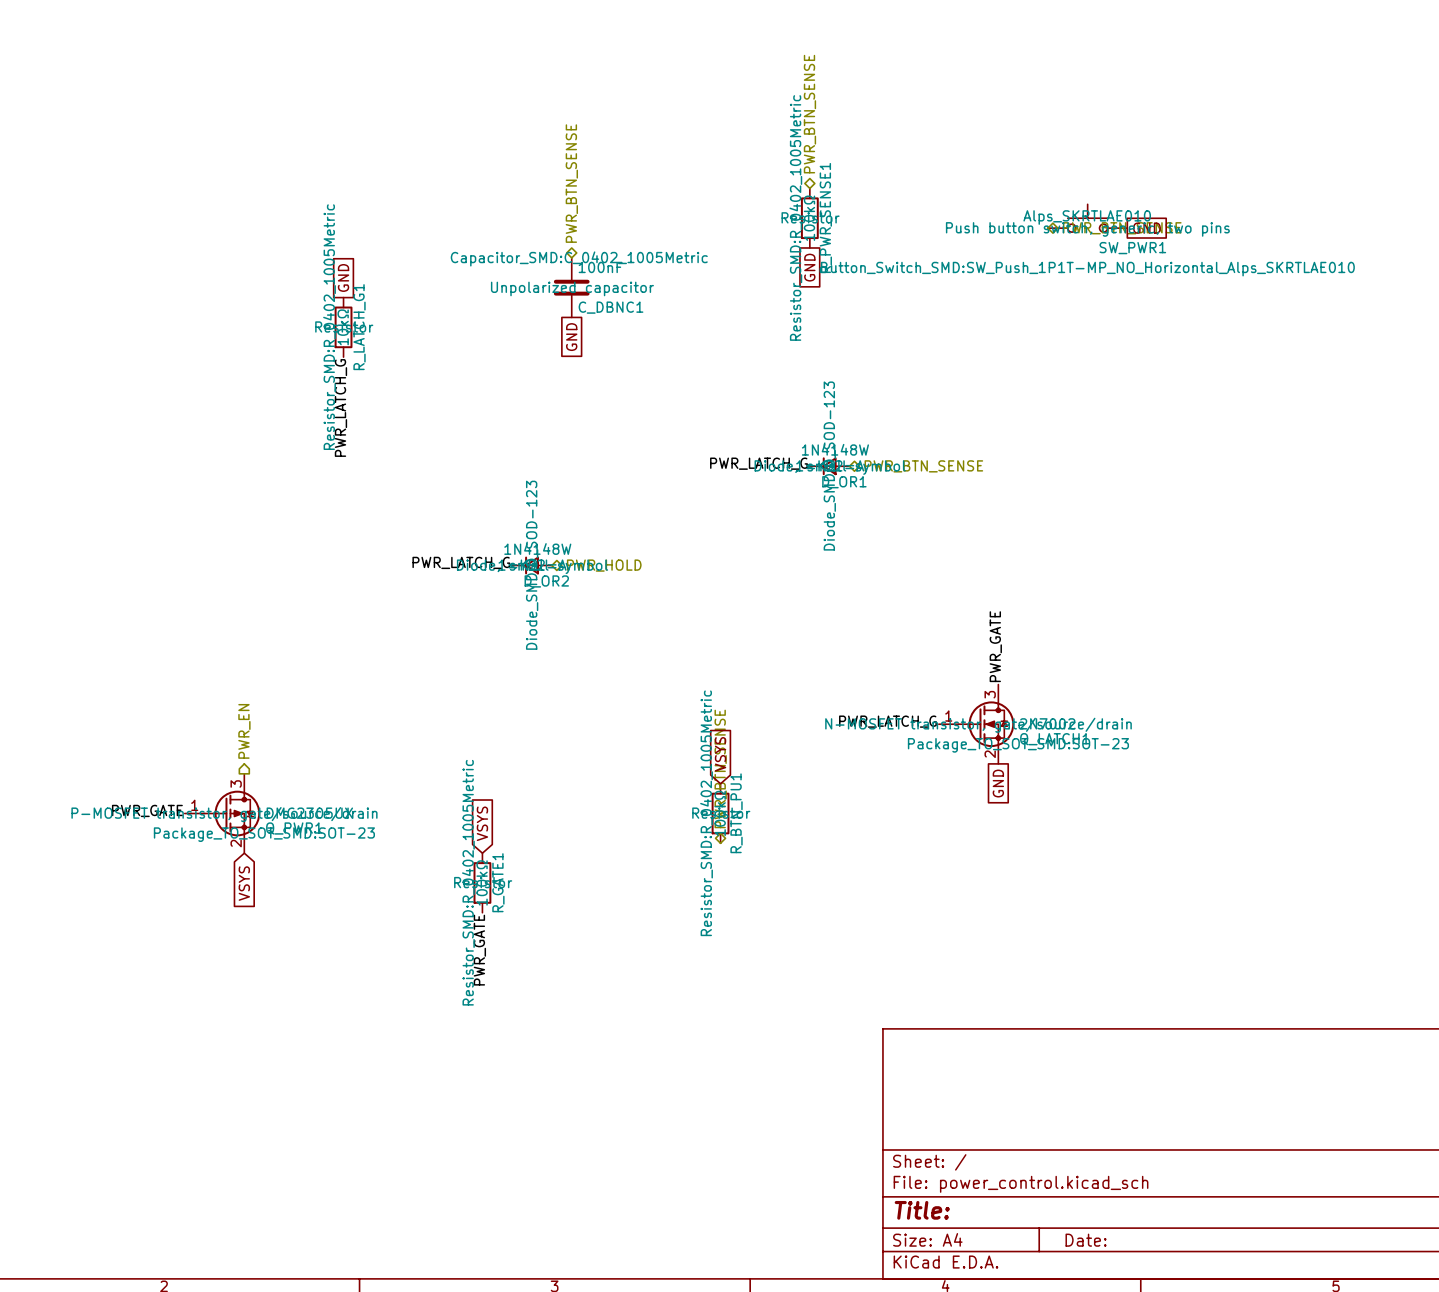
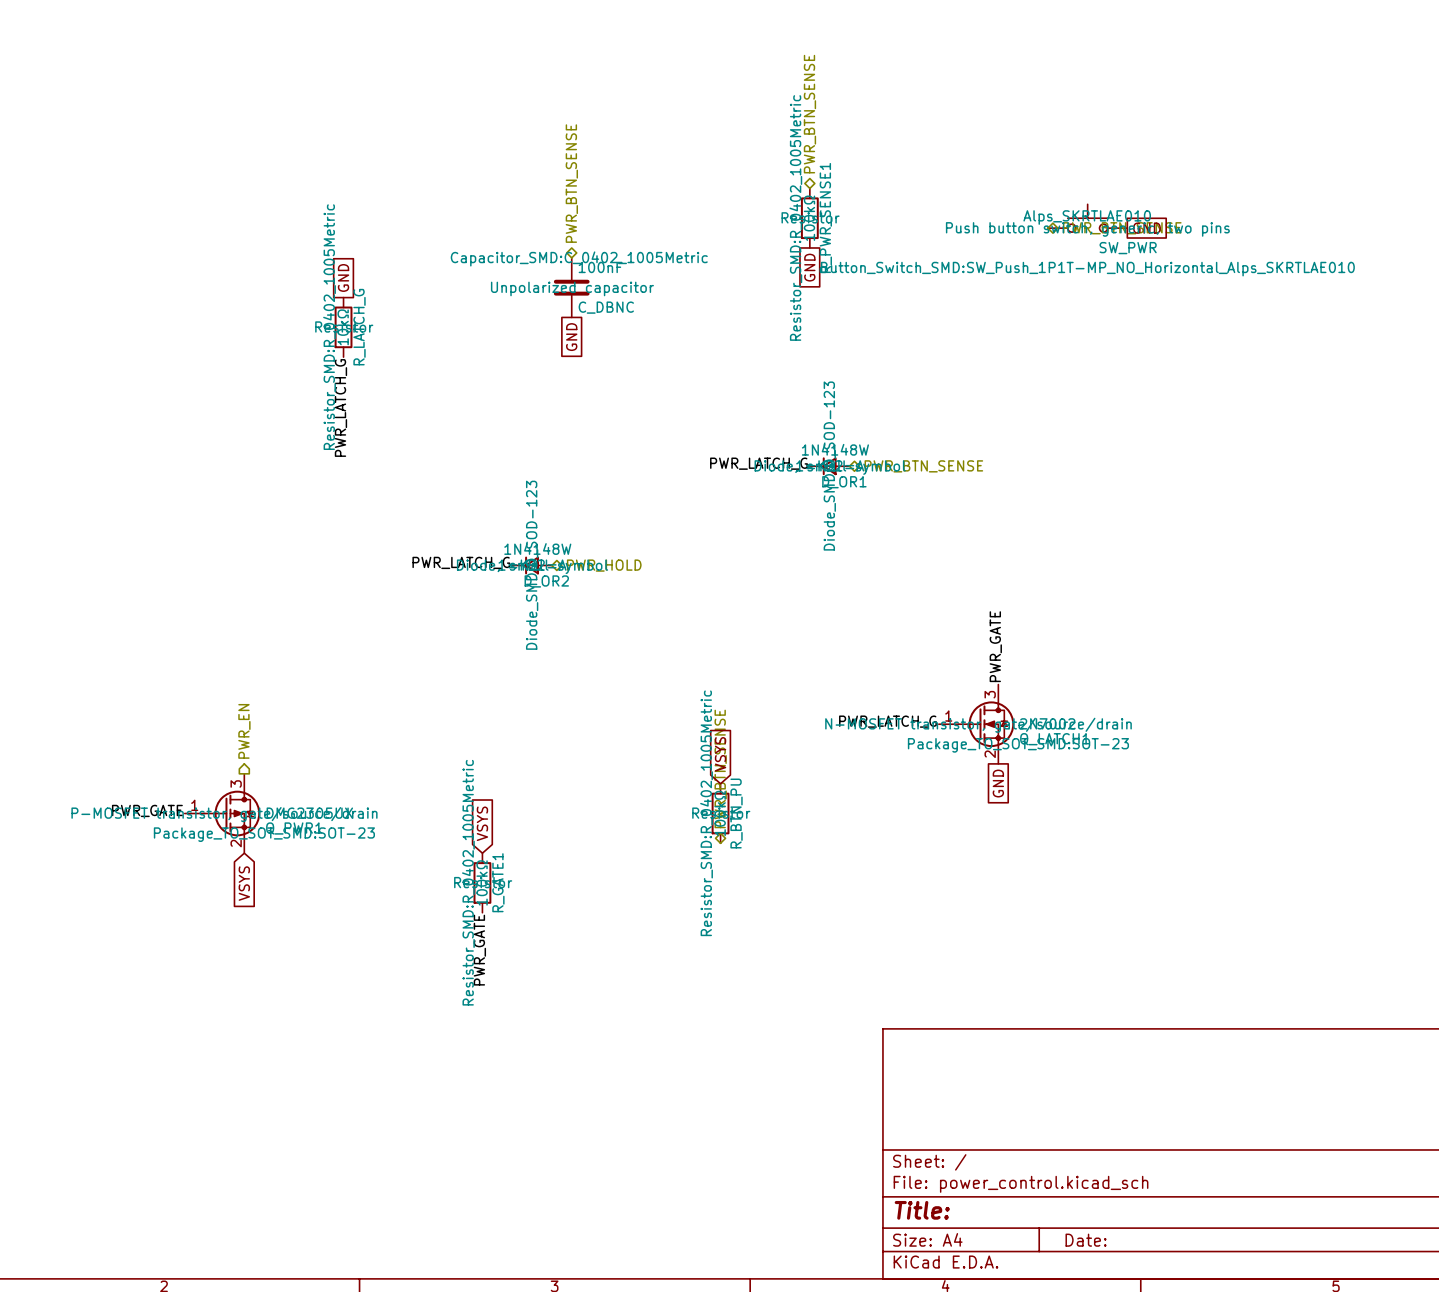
SW_PWR1 name: SW_PWR1 (1132, 248) -> SW_PWR (1128, 248)
C_DBNC1 name: C_DBNC1 (611, 307) -> C_DBNC (606, 307)
R_LATCH_G1 name: R_LATCH_G1 (359, 327) -> R_LATCH_G (359, 327)
R_BTN_PU1 name: R_BTN_PU1 (736, 813) -> R_BTN_PU (736, 813)

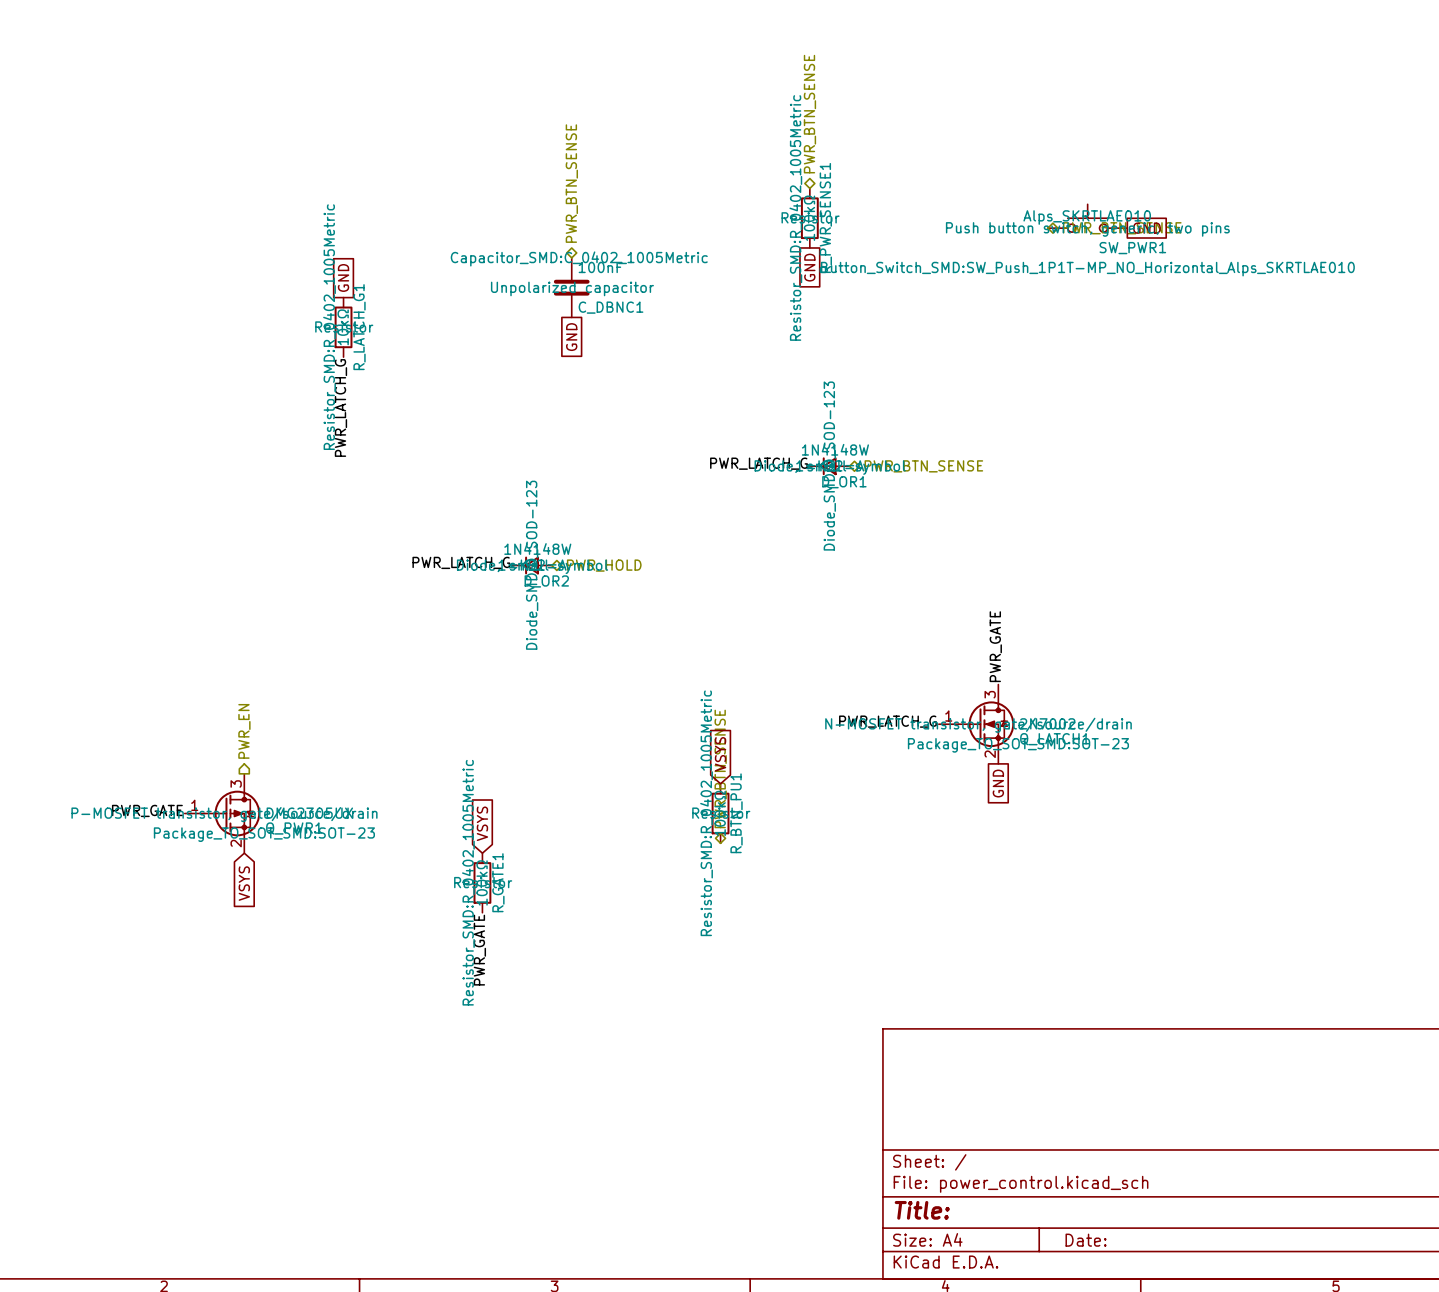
SW_PWR name: SW_PWR (1128, 248) -> SW_PWR1 (1132, 248)
C_DBNC name: C_DBNC (606, 307) -> C_DBNC1 (611, 307)
R_LATCH_G name: R_LATCH_G (359, 327) -> R_LATCH_G1 (359, 327)
R_BTN_PU name: R_BTN_PU (736, 813) -> R_BTN_PU1 (736, 813)

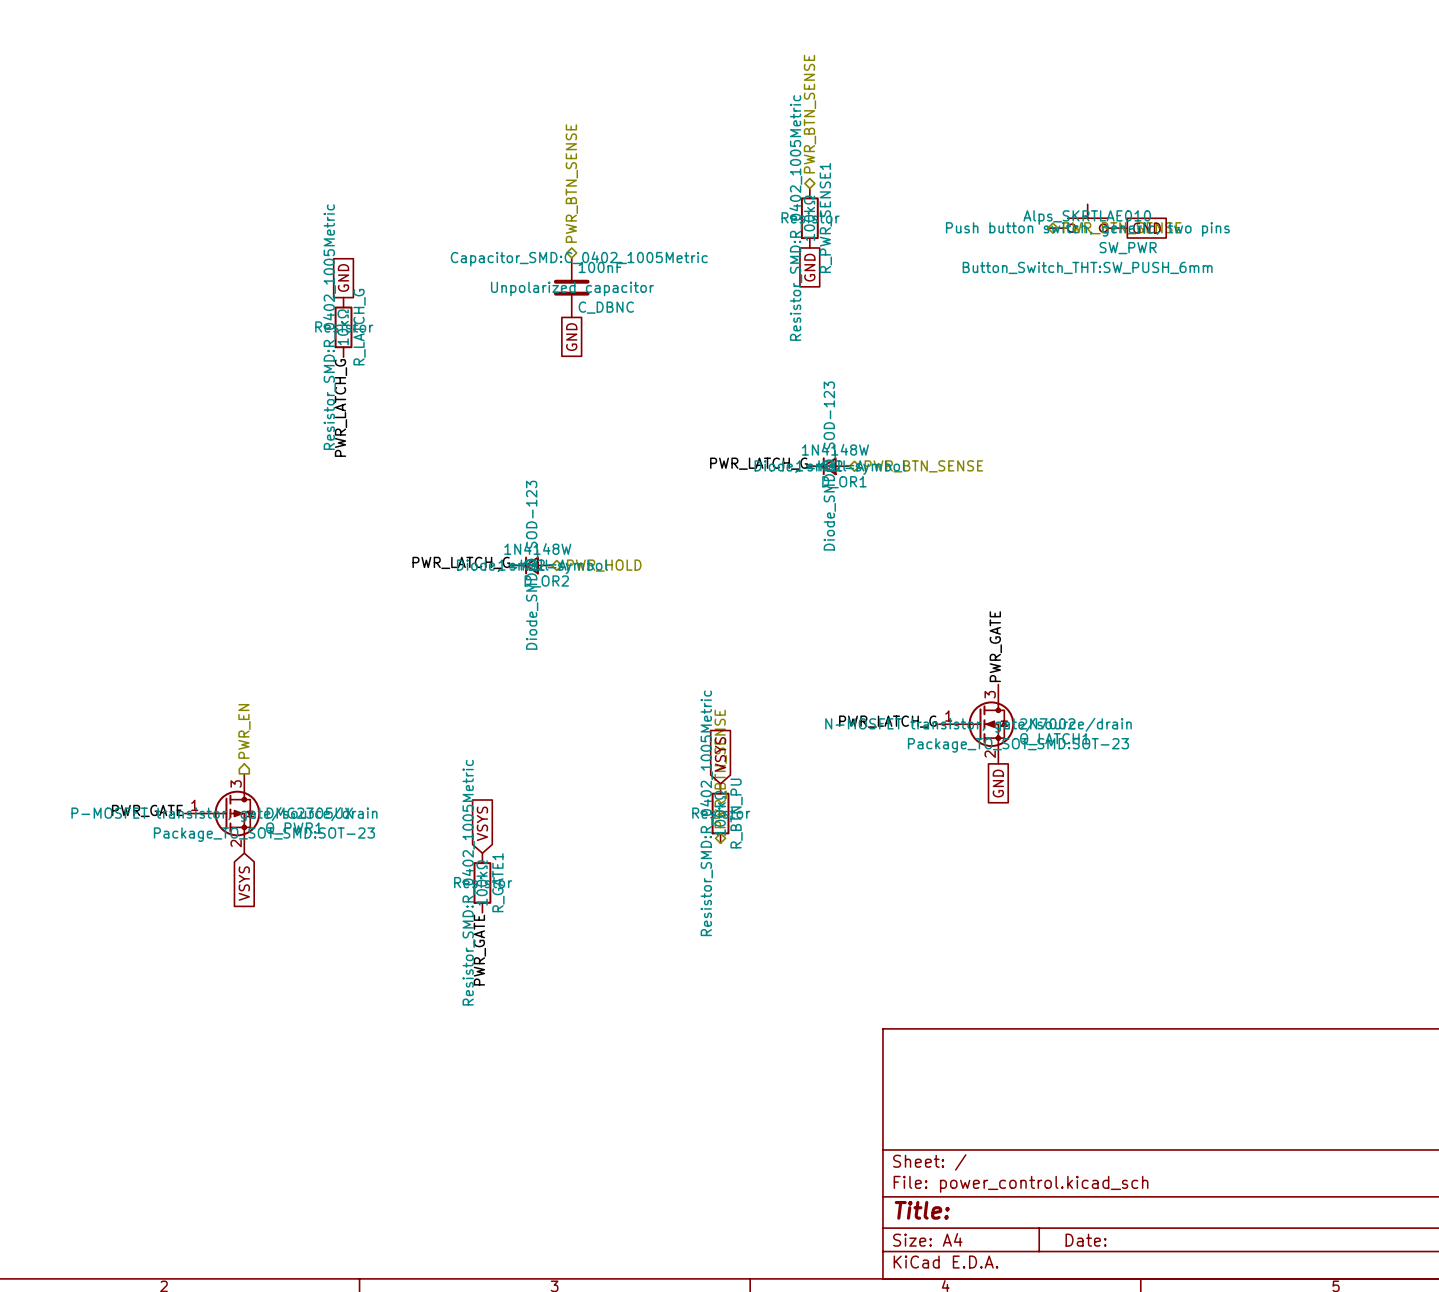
SW_PWR1 name: SW_PWR1 (1132, 248) -> SW_PWR (1128, 248)
SW_PWR1 text: Button_Switch_SMD:SW_Push_1P1T-MP_NO_Horizontal_Alps_SKRTLAE010 (1087, 269) -> Button_Switch_THT:SW_PUSH_6mm (1087, 267)
C_DBNC1 name: C_DBNC1 (611, 307) -> C_DBNC (606, 307)
R_LATCH_G1 name: R_LATCH_G1 (359, 327) -> R_LATCH_G (359, 327)
R_BTN_PU1 name: R_BTN_PU1 (736, 813) -> R_BTN_PU (736, 813)

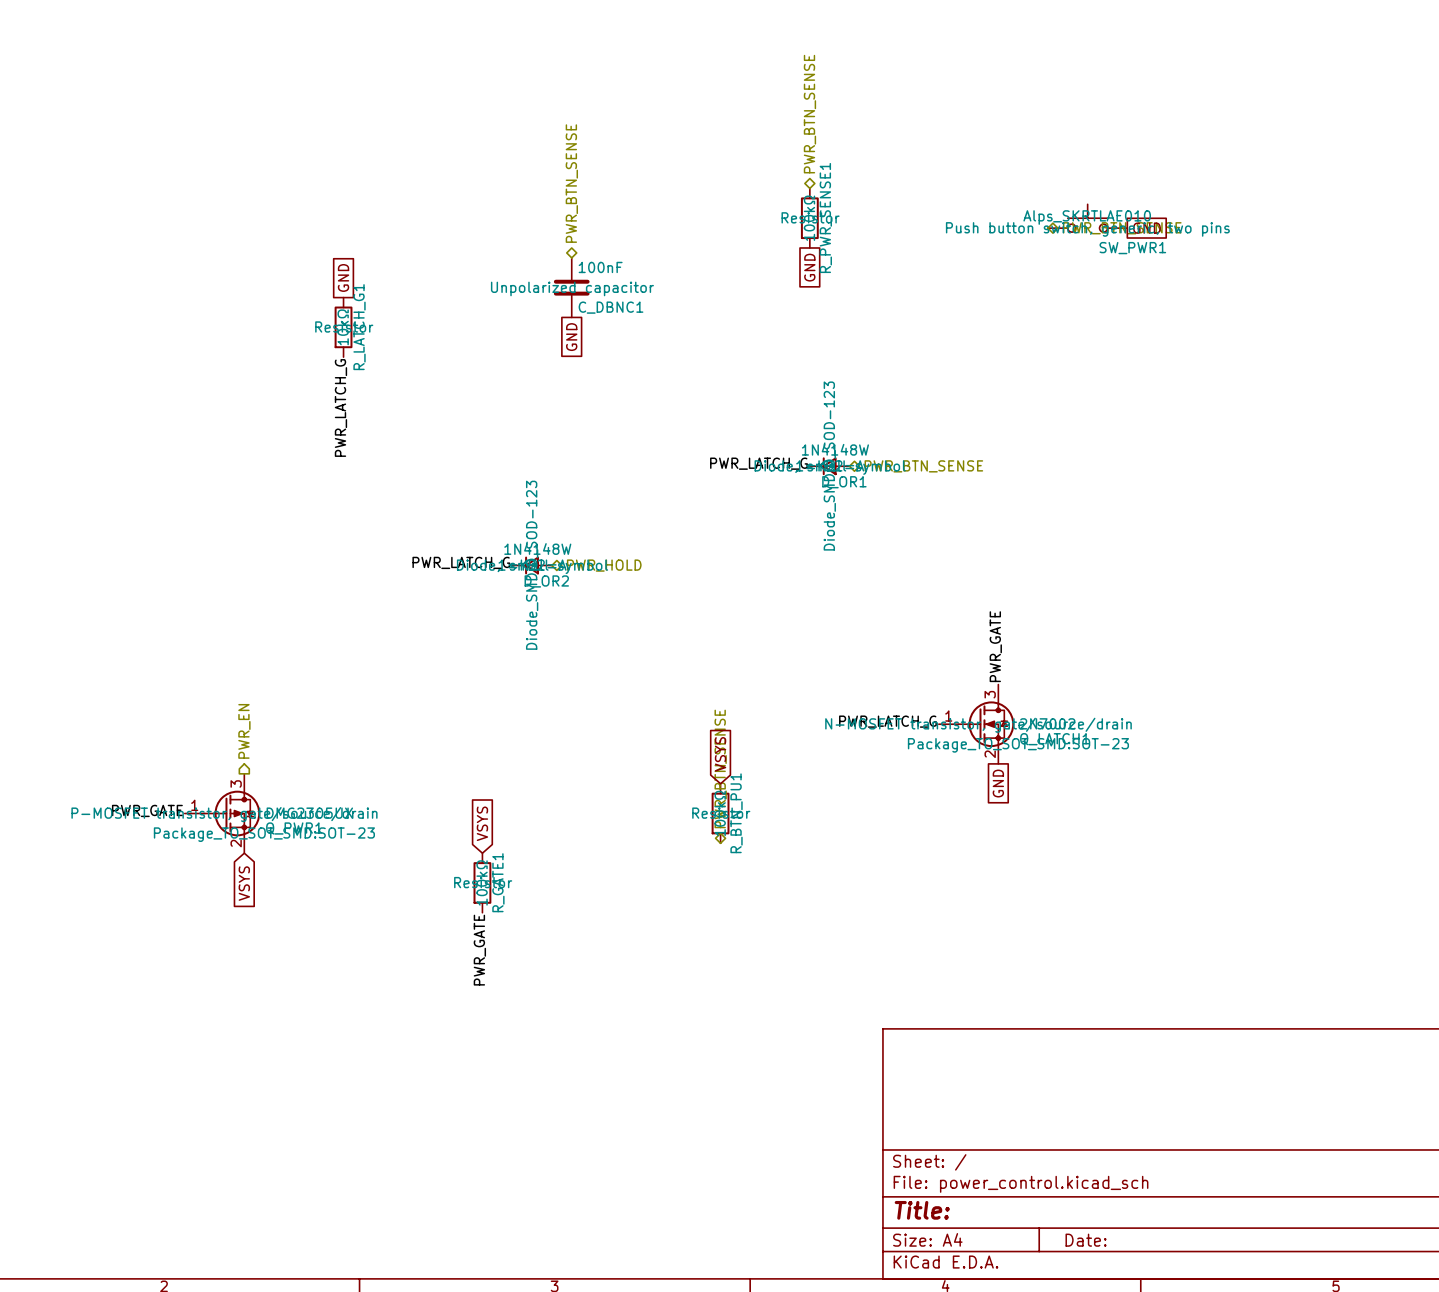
R_PWR_SENSE1 text: Resistor_SMD:R_0402_1005Metric (795, 217) -> none
SW_PWR name: SW_PWR (1128, 248) -> SW_PWR1 (1132, 248)
C_DBNC text: Capacitor_SMD:C_0402_1005Metric (579, 258) -> none
SW_PWR text: Button_Switch_THT:SW_PUSH_6mm (1087, 267) -> none
C_DBNC name: C_DBNC (606, 307) -> C_DBNC1 (611, 307)
R_LATCH_G text: Resistor_SMD:R_0402_1005Metric (329, 327) -> none
R_LATCH_G name: R_LATCH_G (359, 327) -> R_LATCH_G1 (359, 327)
R_BTN_PU text: Resistor_SMD:R_0402_1005Metric (706, 813) -> none
R_BTN_PU name: R_BTN_PU (736, 813) -> R_BTN_PU1 (736, 813)
R_GATE1 text: Resistor_SMD:R_0402_1005Metric (468, 882) -> none

